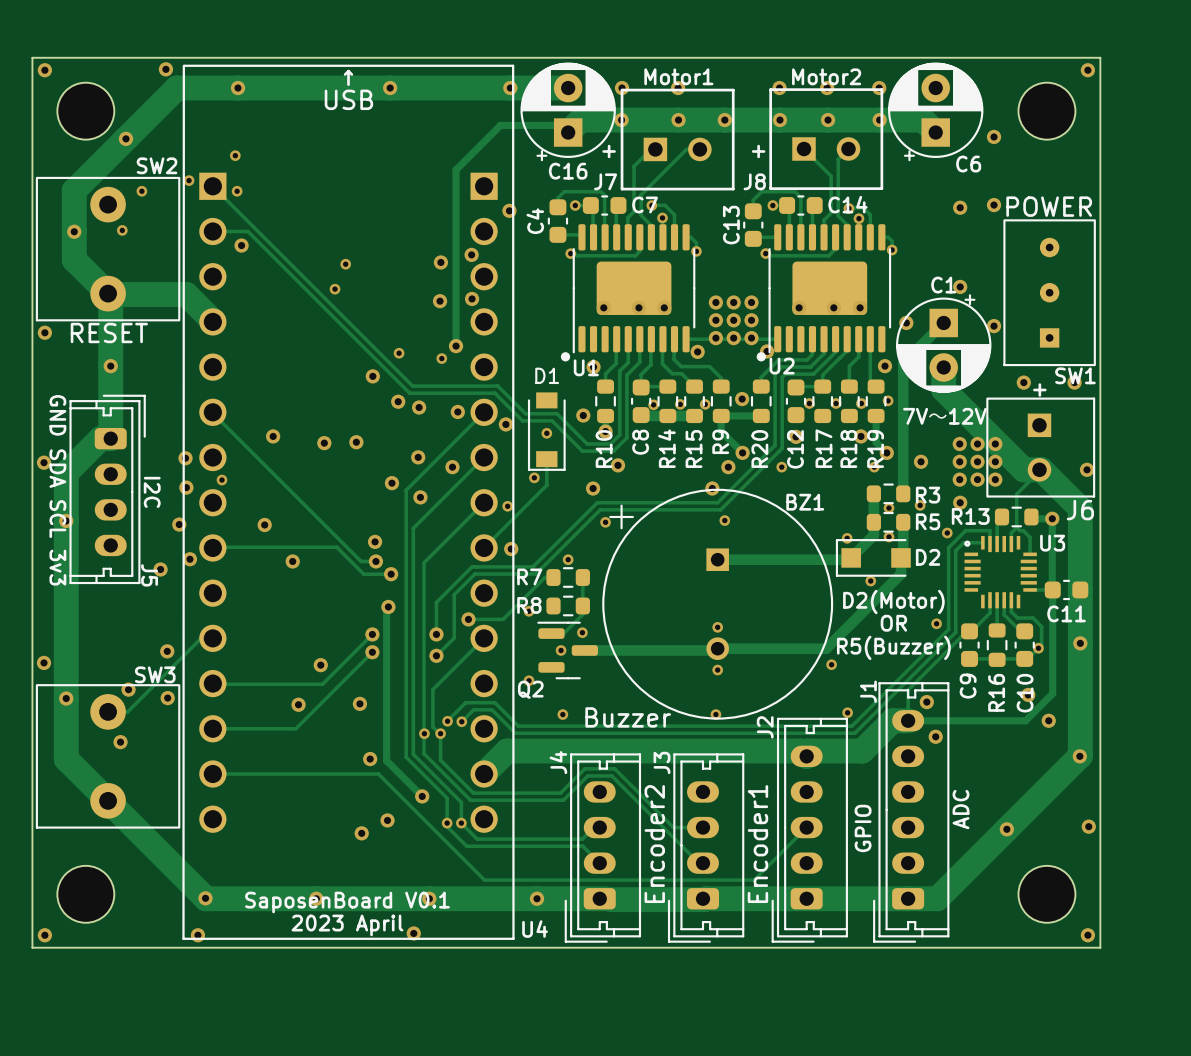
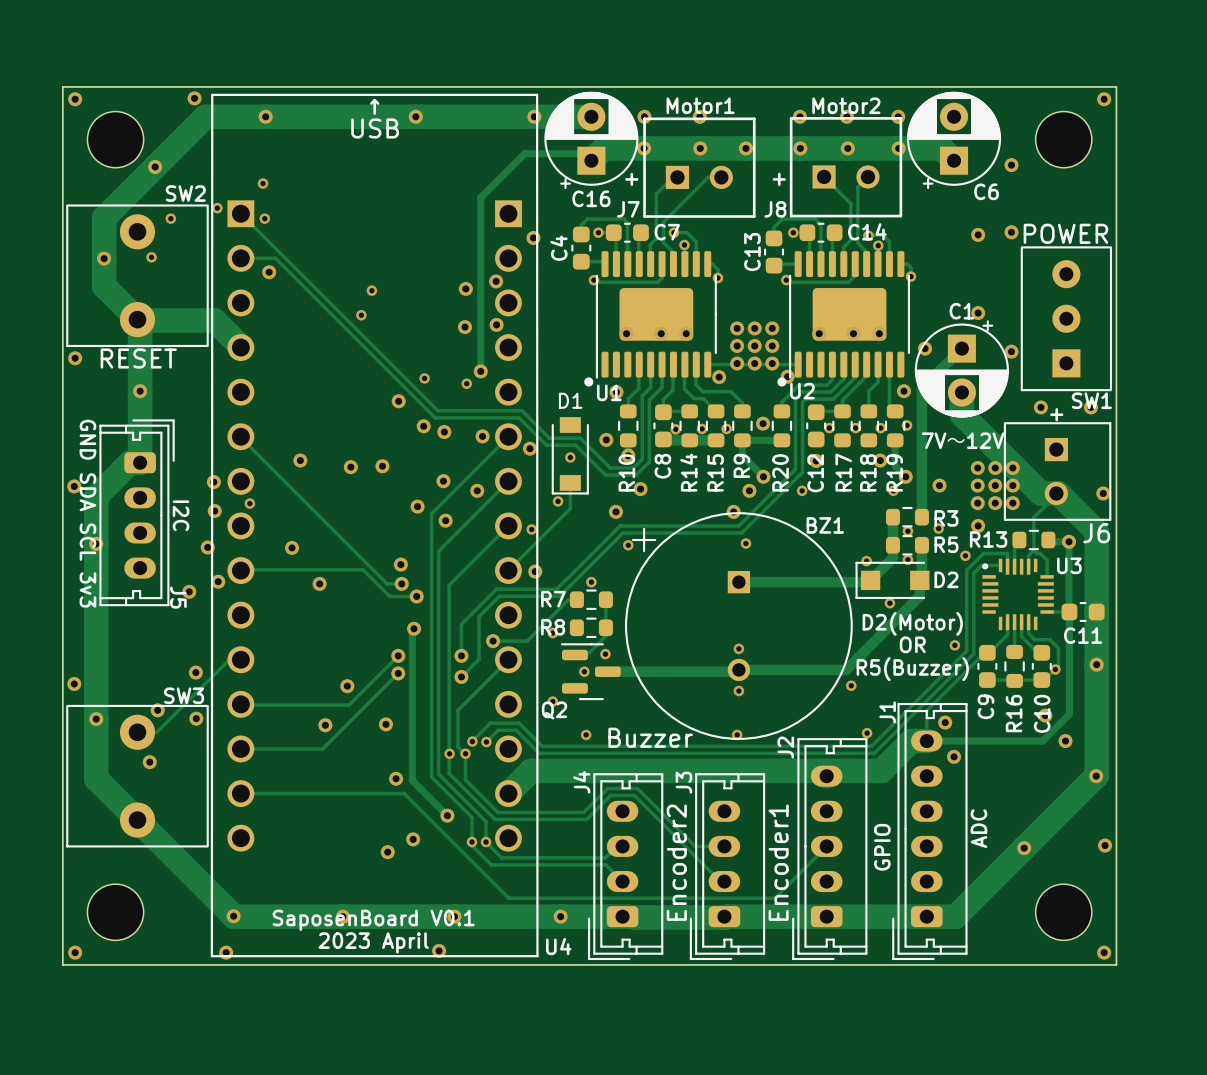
SW1 footprint: [1003, 219, 1096, 367] -> [1020, 246, 1113, 392]

